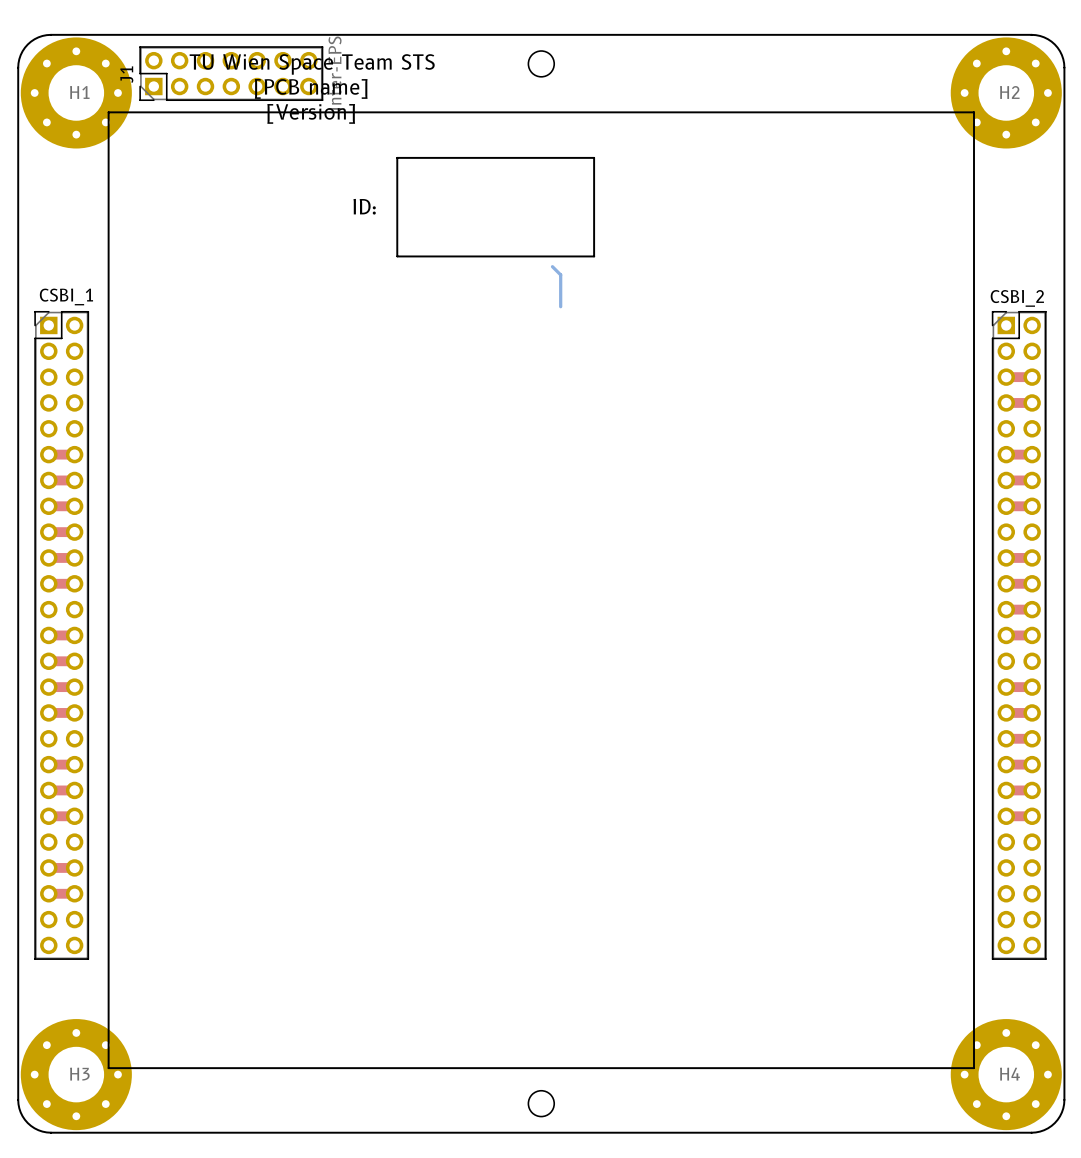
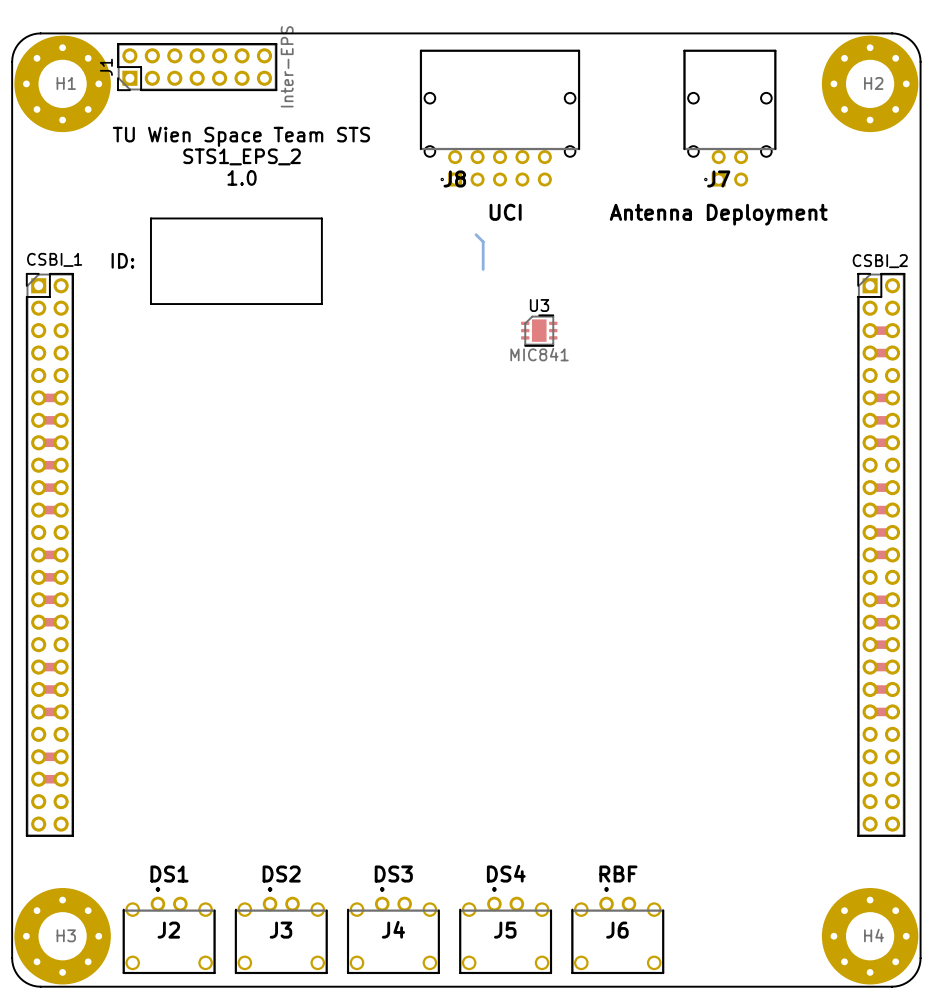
round board edge: [527, 50, 555, 78] -> none
text position: TU Wien Space Team STS (312, 64) -> TU Wien Space Team STS (241, 136)
text: [PCB name] (311, 88) -> none
line: (108, 112) (974, 112) (974, 1068) (108, 1068) (108, 112) -> none
text: [Version] (311, 113) -> none
J8: none -> UCI (500, 118)
J7: none -> Antenna Deployment (729, 118)
text: none -> STS1_EPS_2 (242, 156)
text: none -> 1.0 (242, 177)
text position: ID: (364, 206) -> ID: (122, 260)
line: (397, 256) (397, 157) (594, 157) (594, 256) -> (150, 303) (150, 218) (321, 218) (321, 303)
line: (397, 256) (594, 256) -> (151, 304) (322, 304)
U3: none -> MIC841 (539, 330)
J2: none -> DS1 (169, 930)
J3: none -> DS2 (281, 930)
J4: none -> DS3 (393, 930)
J5: none -> DS4 (505, 930)
J6: none -> RBF (617, 930)
round board edge: [527, 1090, 555, 1118] -> none

